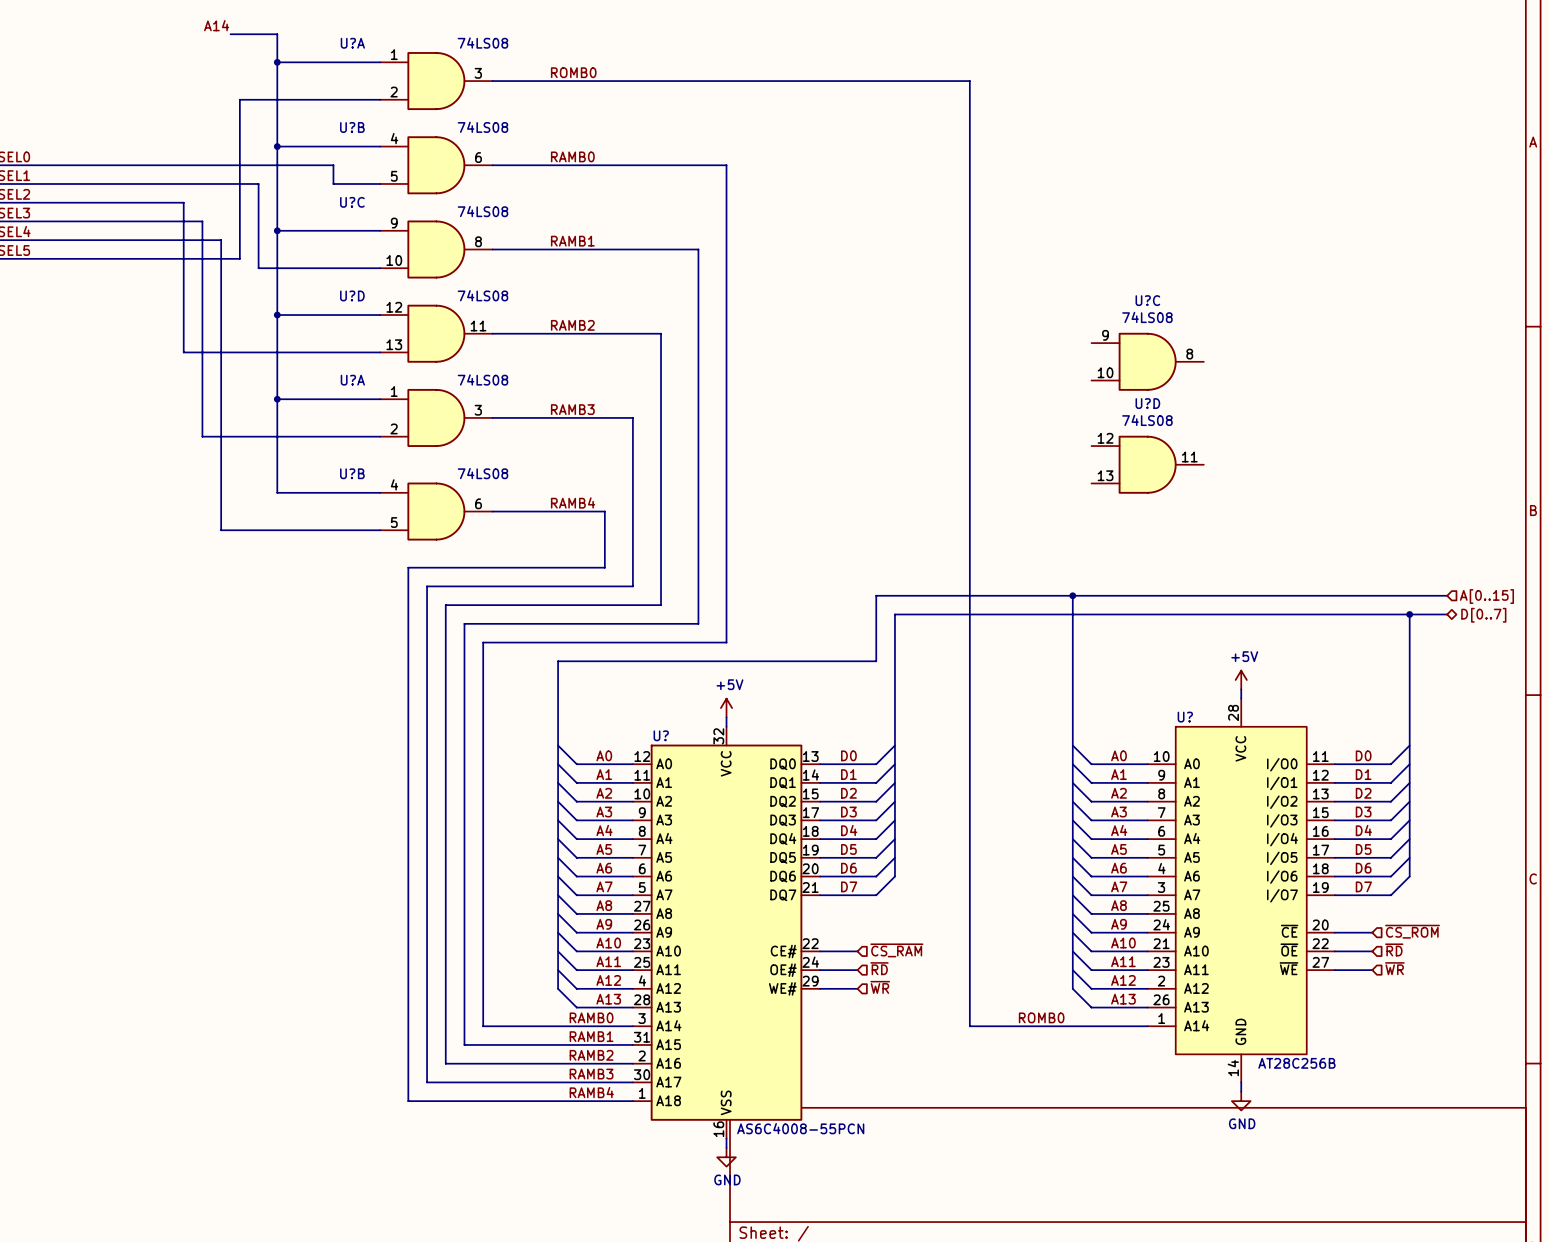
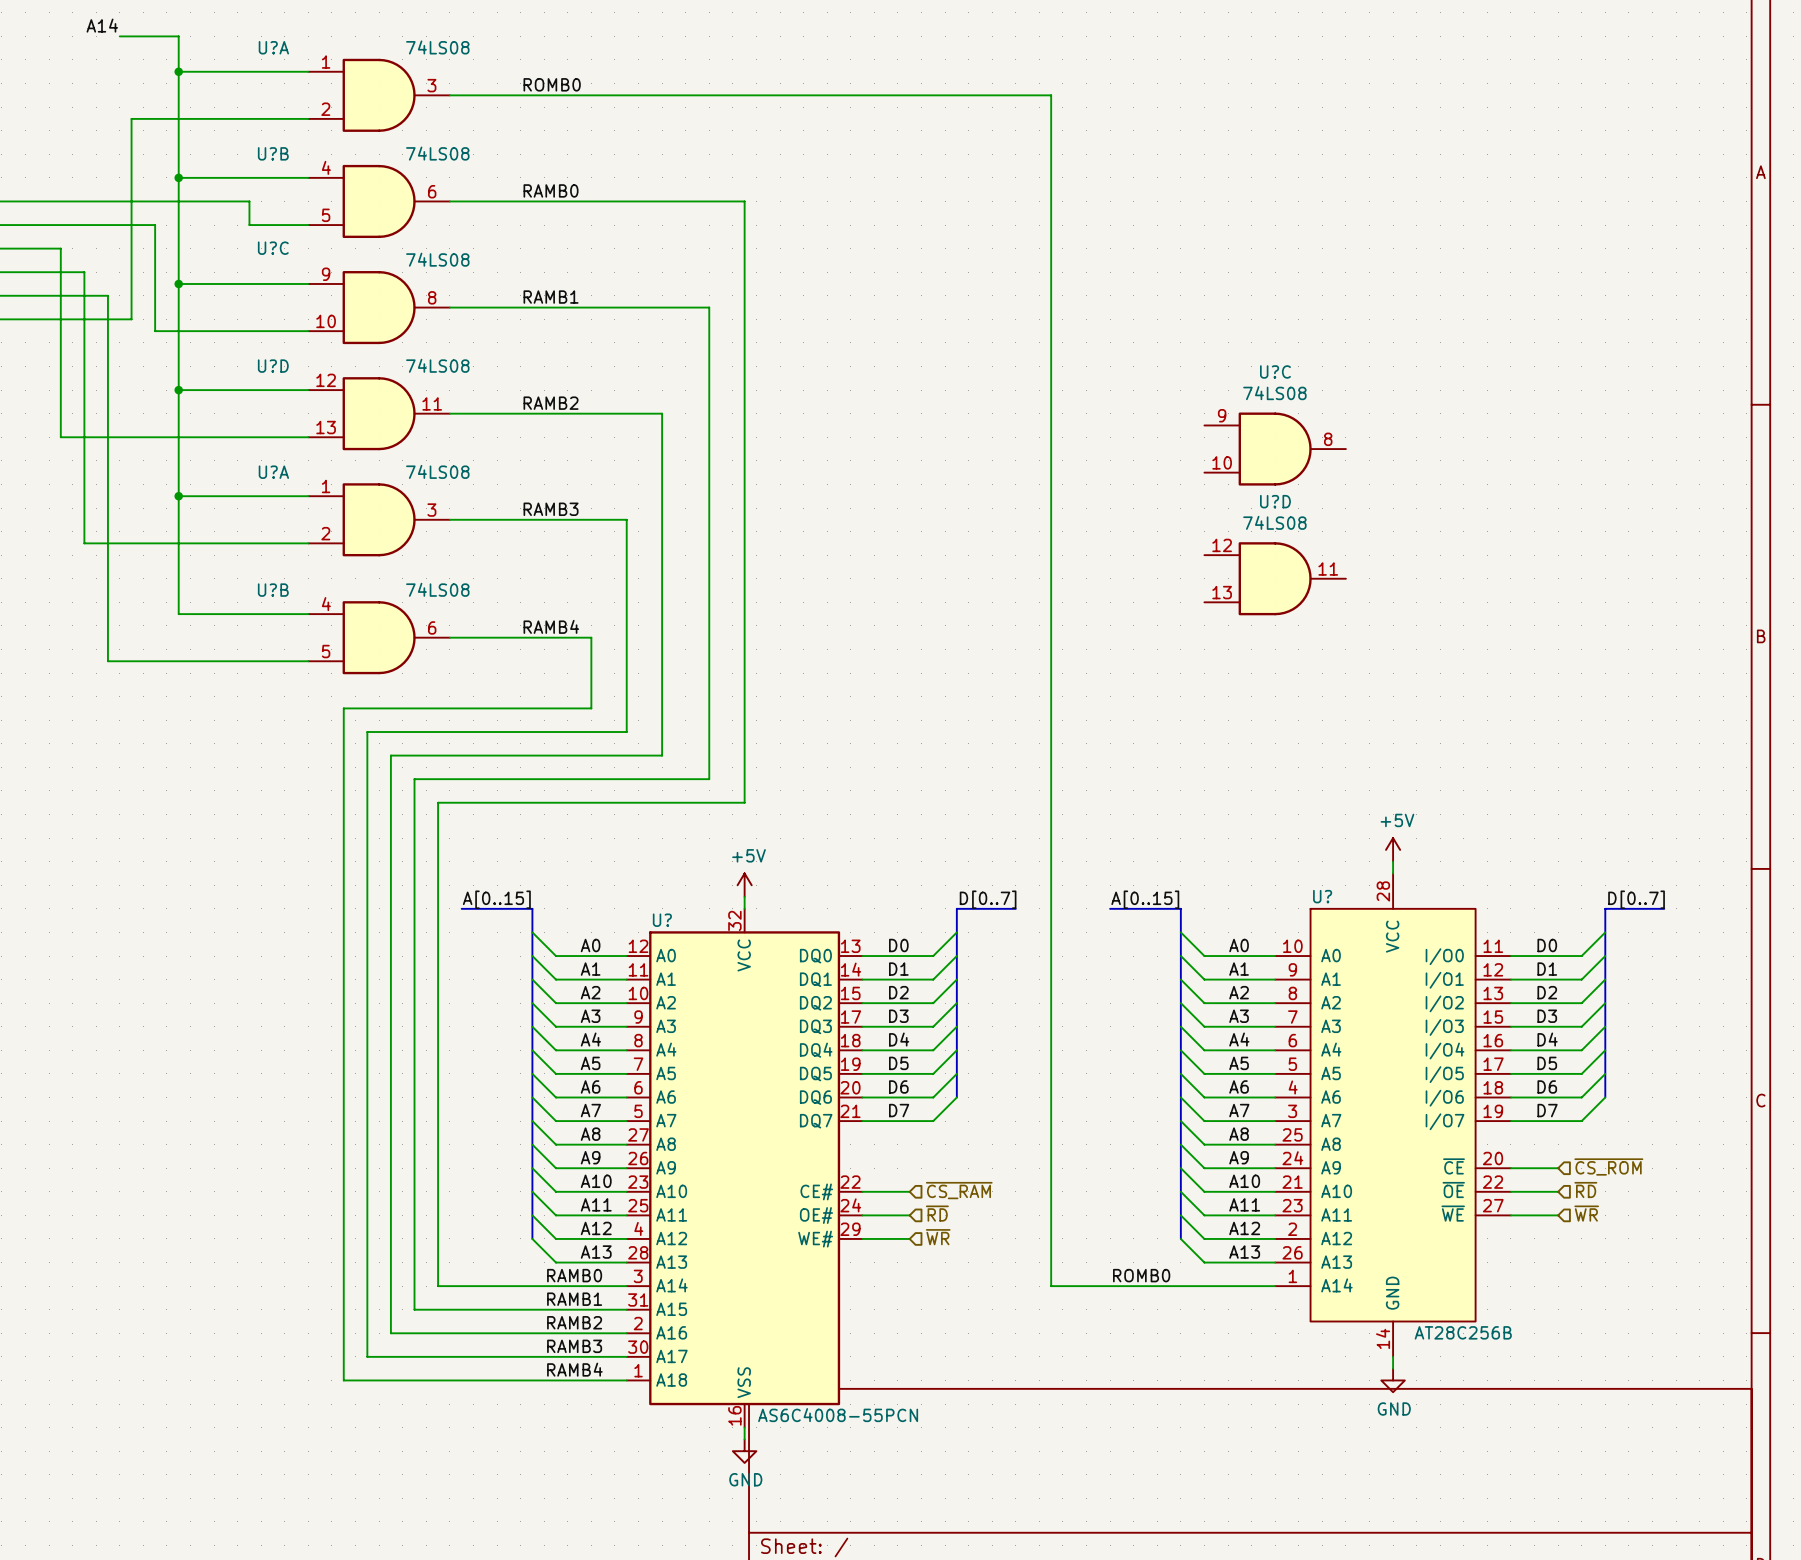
bus: (1072, 595) (1072, 726) -> (1110, 908) (1180, 908)
junction: (1072, 595) -> none
bus: (1447, 595) (876, 595) (876, 661) (558, 661) (558, 726) -> (461, 908) (532, 908)
hierarchical label: A[0..15] (1486, 596) -> none
bus: (1409, 614) (1409, 726) -> (1664, 908) (1605, 908)
junction: (1409, 614) -> none
bus: (1447, 614) (894, 614) (894, 726) -> (1015, 908) (956, 908)
hierarchical label: D[0..7] (1483, 615) -> none
label: none -> A[0..15] (496, 899)
label: none -> D[0..7] (988, 899)
label: none -> A[0..15] (1145, 899)
label: none -> D[0..7] (1636, 899)

